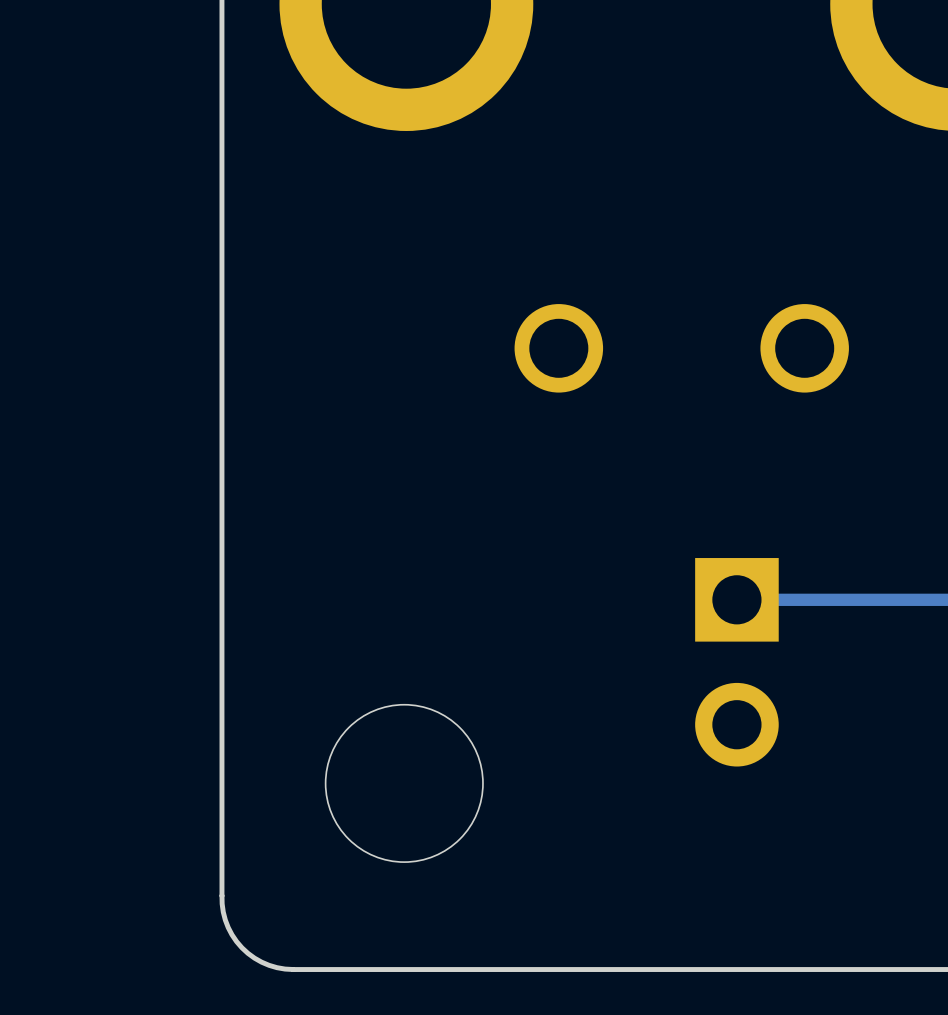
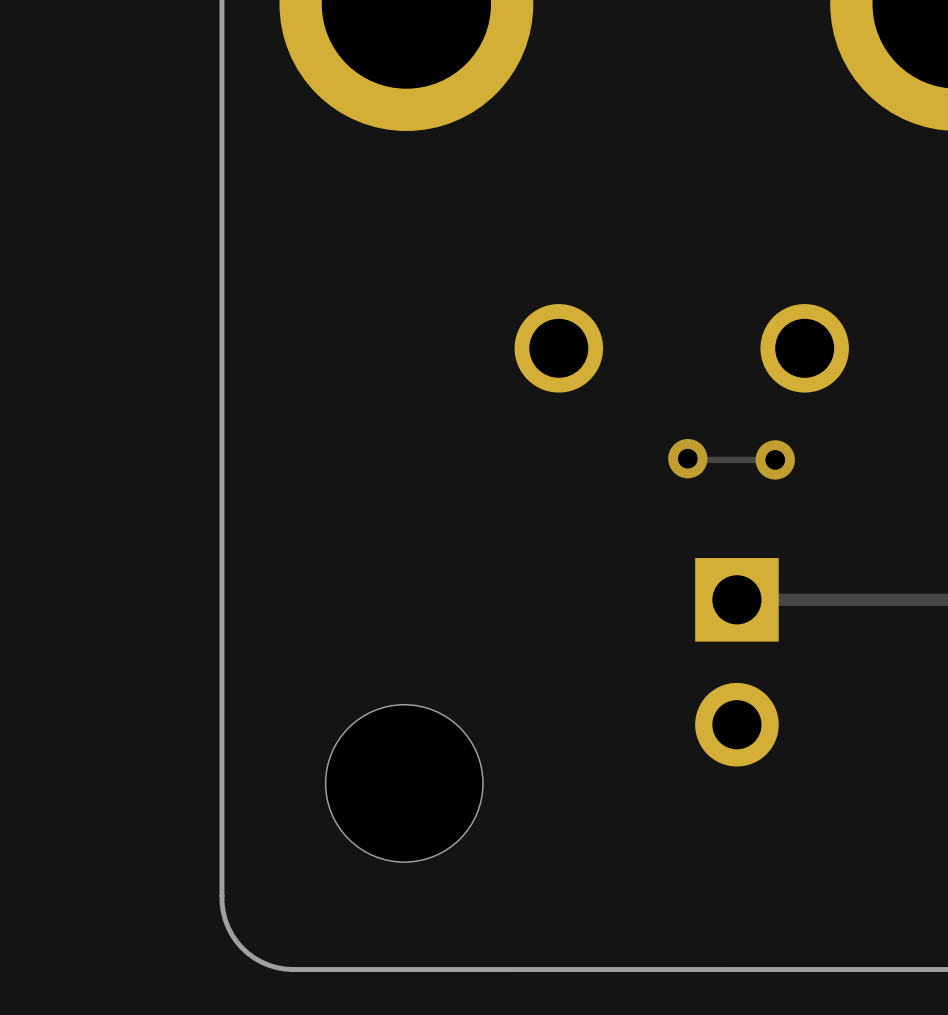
track: none -> (687, 458) (775, 459)
via: none -> (687, 458)
via: none -> (775, 459)

